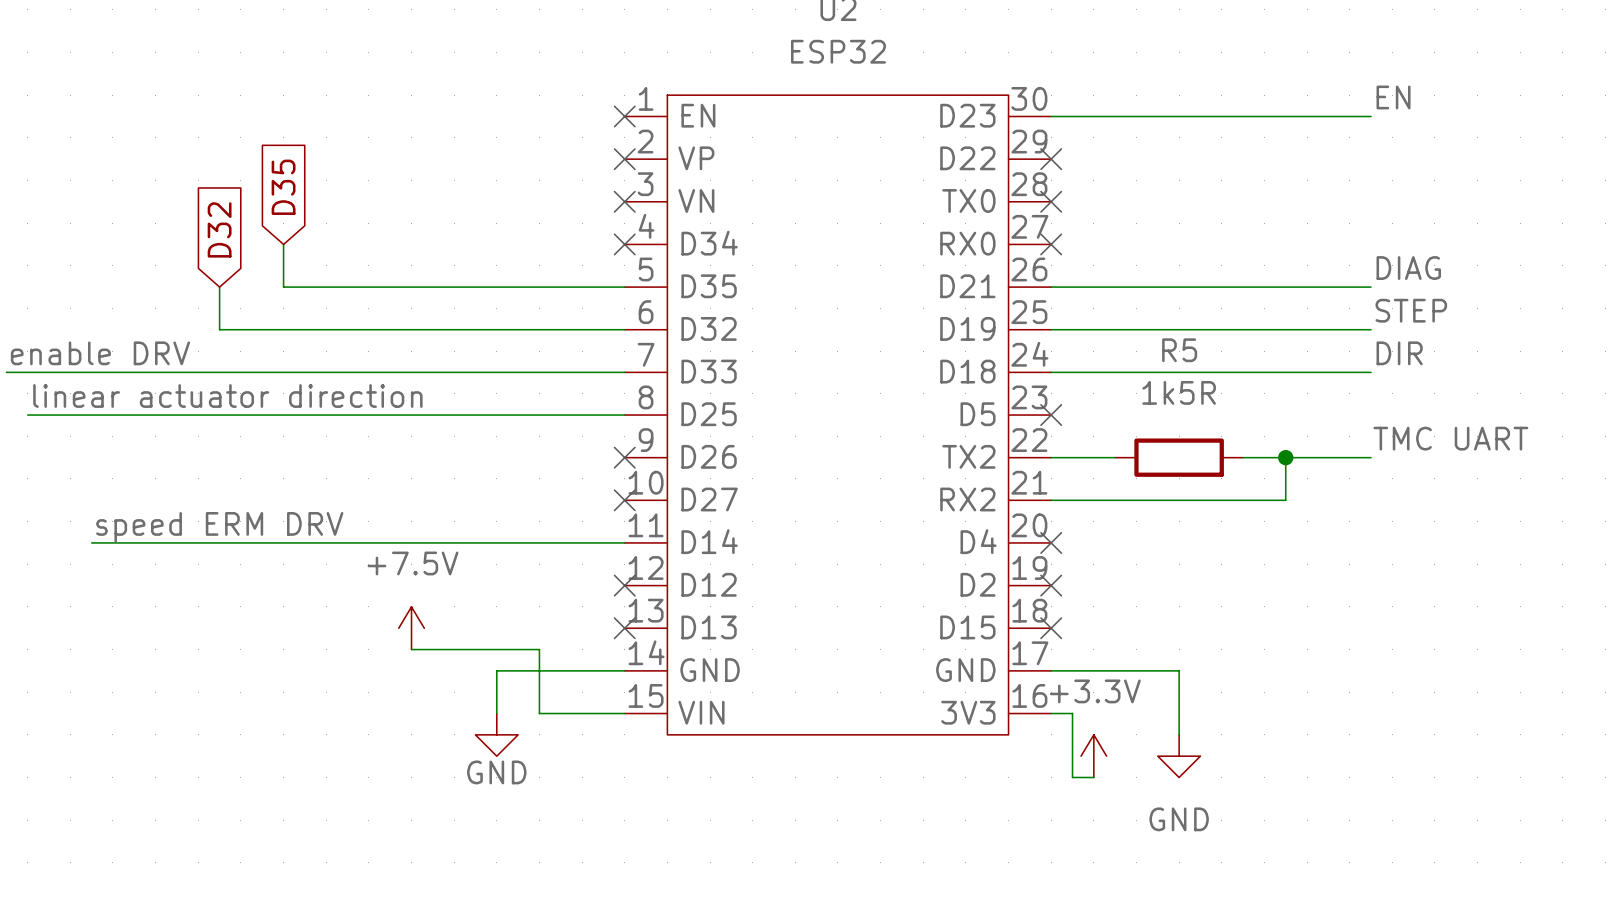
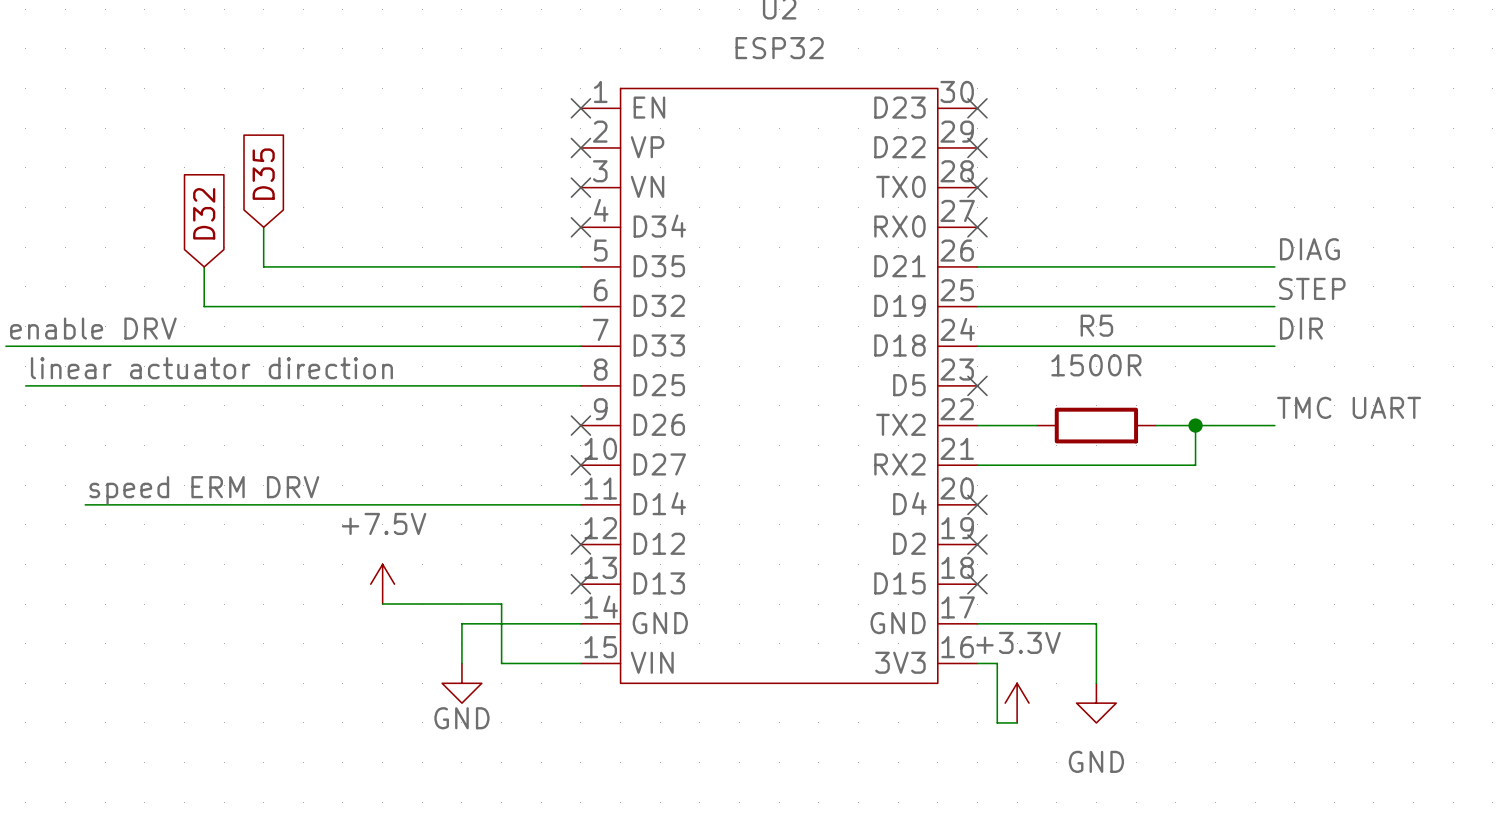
label: EN (1393, 97) -> none
wire: (1051, 116) (1371, 116) -> none
no-connect mark: none -> (977, 108)
R5 value: 1k5R (1179, 392) -> 1500R (1096, 365)

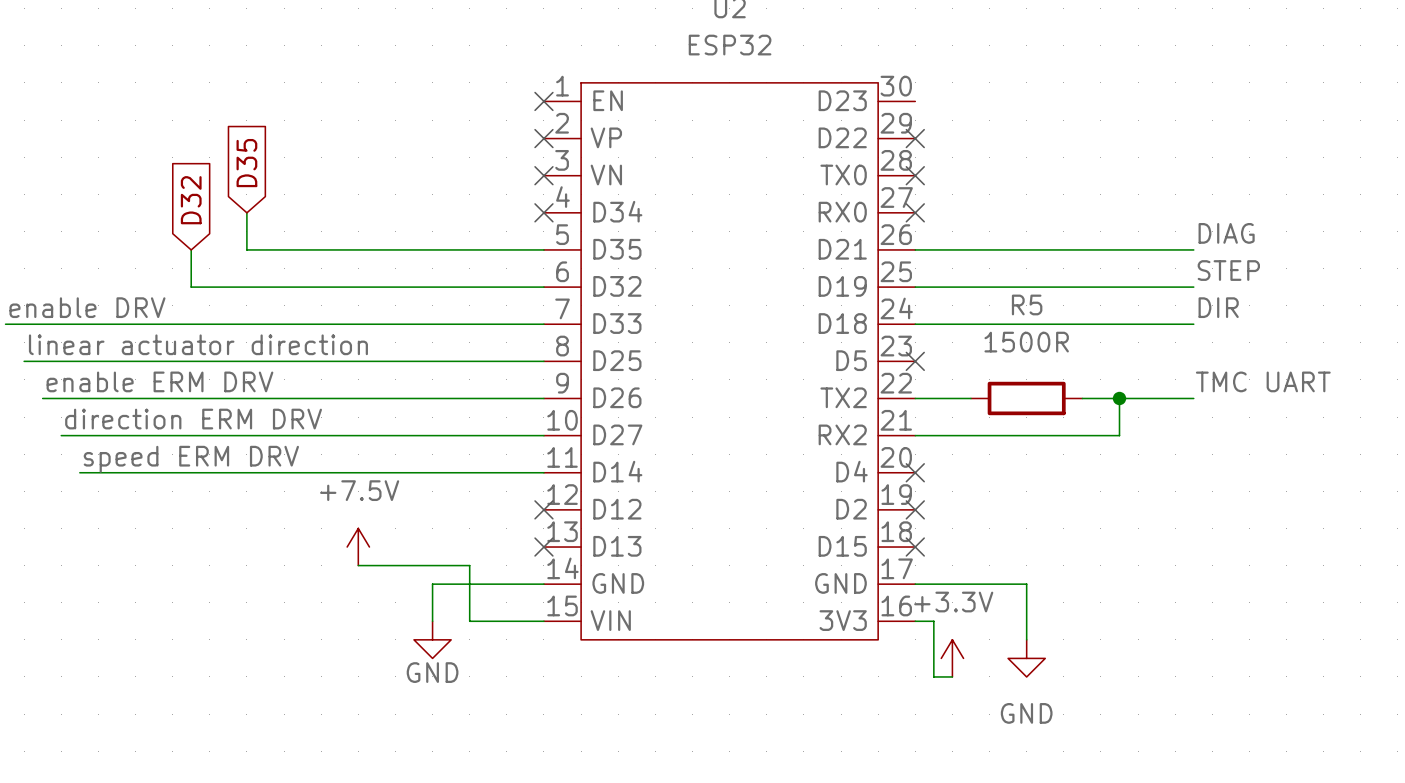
no-connect mark: (977, 108) -> none
label: none -> enable ERM DRV (159, 381)
wire: none -> (42, 398) (543, 398)
no-connect mark: (580, 425) -> none
label: none -> direction ERM DRV (193, 419)
wire: none -> (61, 435) (543, 435)
no-connect mark: (580, 465) -> none

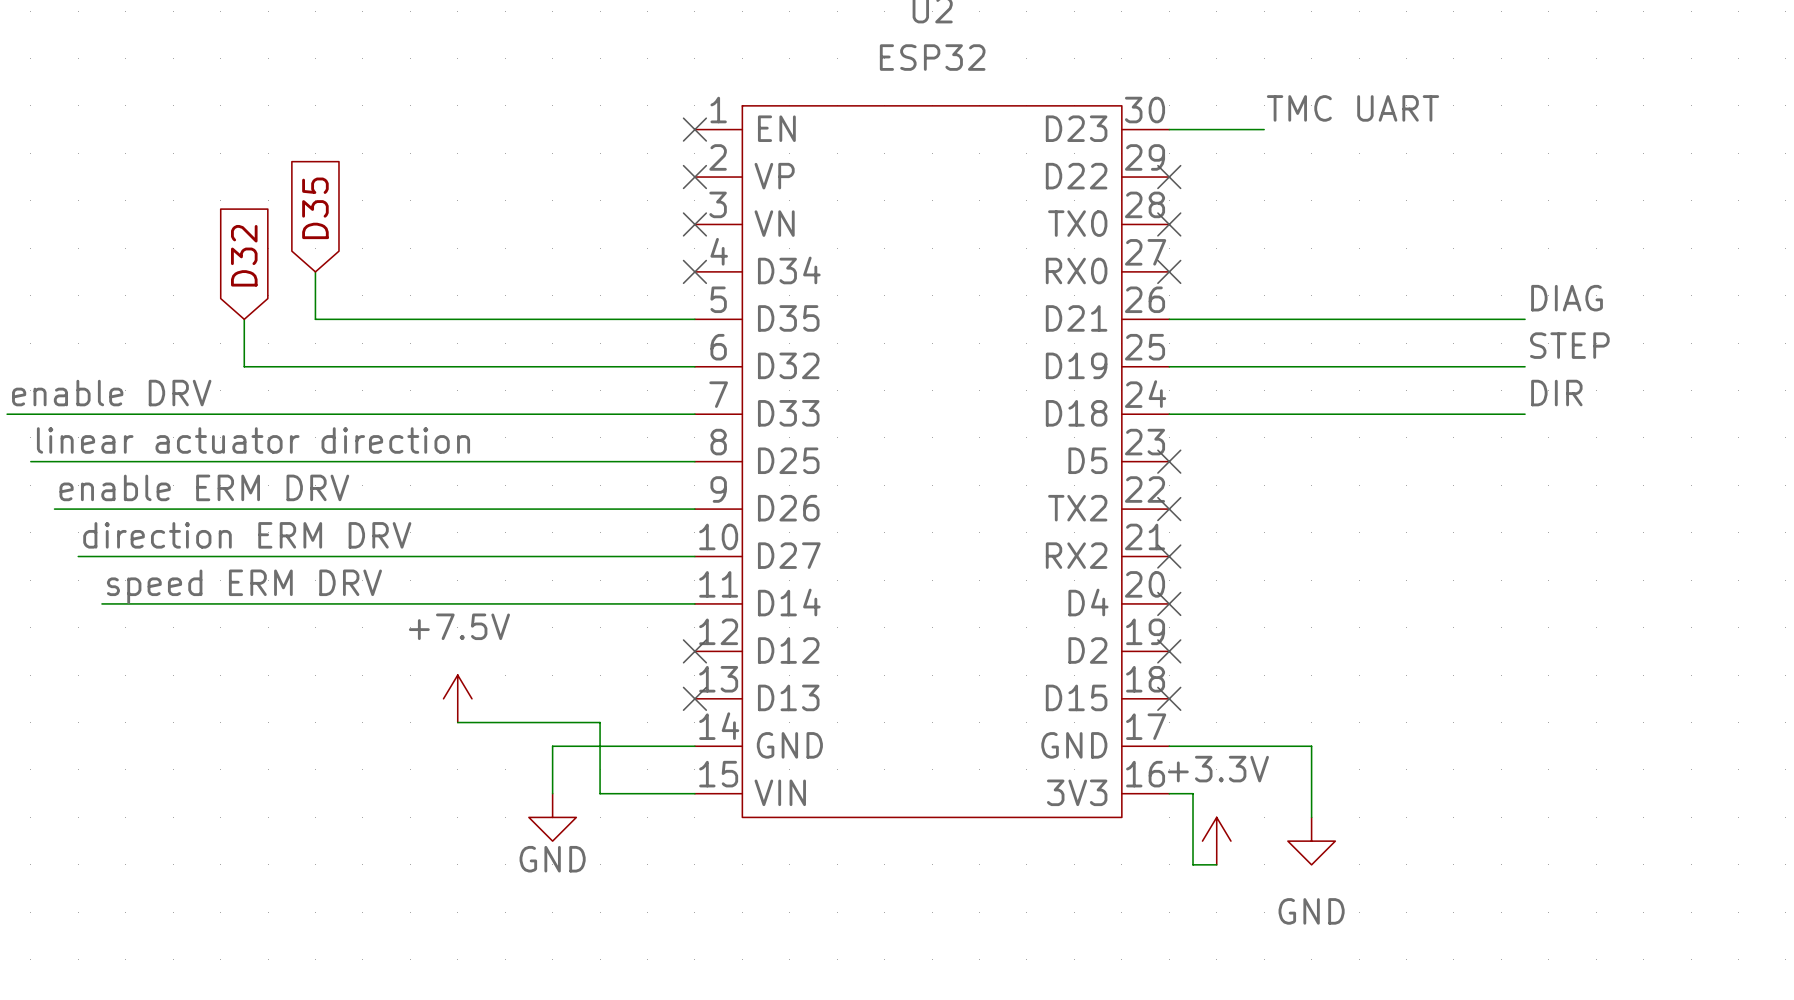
wire: none -> (1169, 129) (1264, 129)
label position: TMC UART (1263, 381) -> TMC UART (1352, 108)
wire: (915, 398) (970, 398) -> none
no-connect mark: none -> (1169, 509)
R5: 1500R (1026, 398) -> none
wire: (1082, 398) (1193, 398) -> none
wire: (1119, 398) (1119, 435) (915, 435) -> none
junction: (1119, 398) -> none
no-connect mark: none -> (1169, 556)

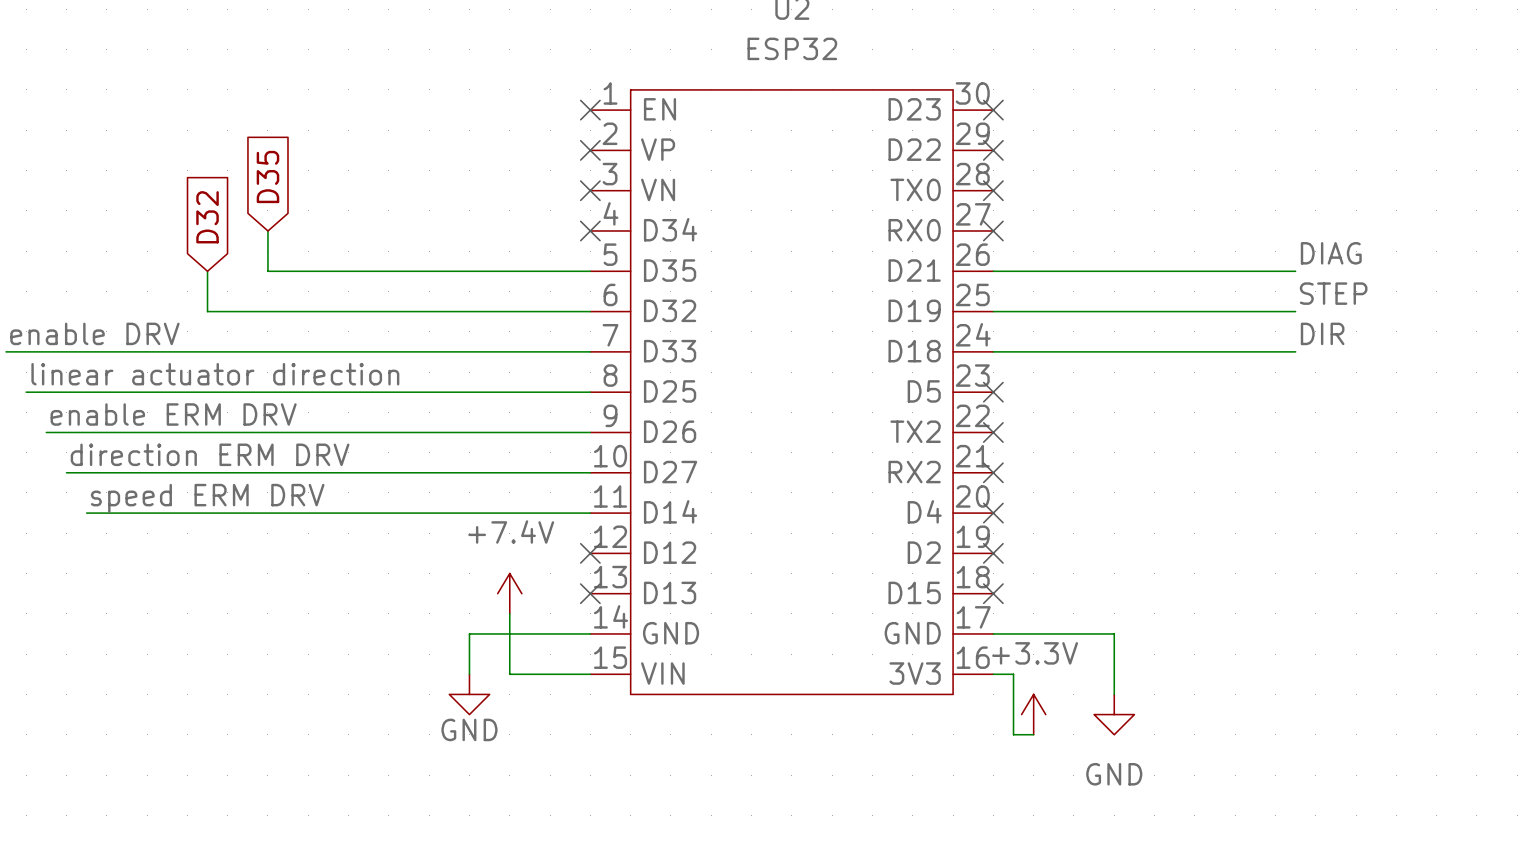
label: TMC UART (1352, 108) -> none
wire: (1169, 129) (1264, 129) -> none
no-connect mark: none -> (993, 110)
power symbol: +7.5V (457, 698) -> none
power symbol: none -> +7.4V (509, 593)
wire: (457, 722) (600, 722) -> none

